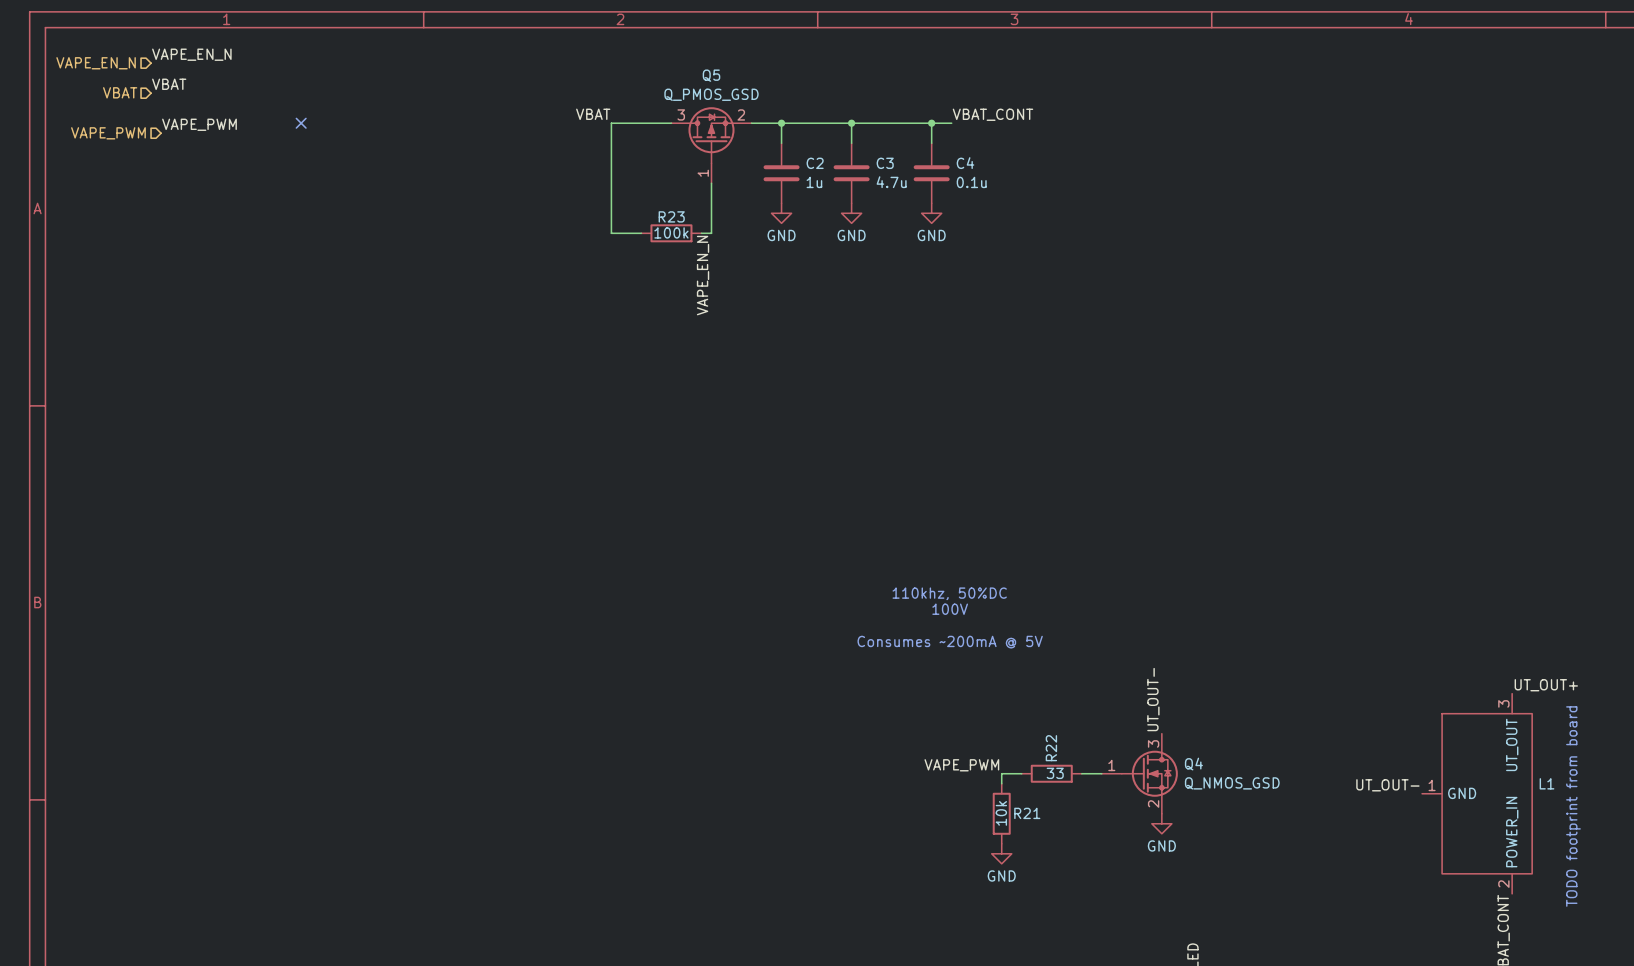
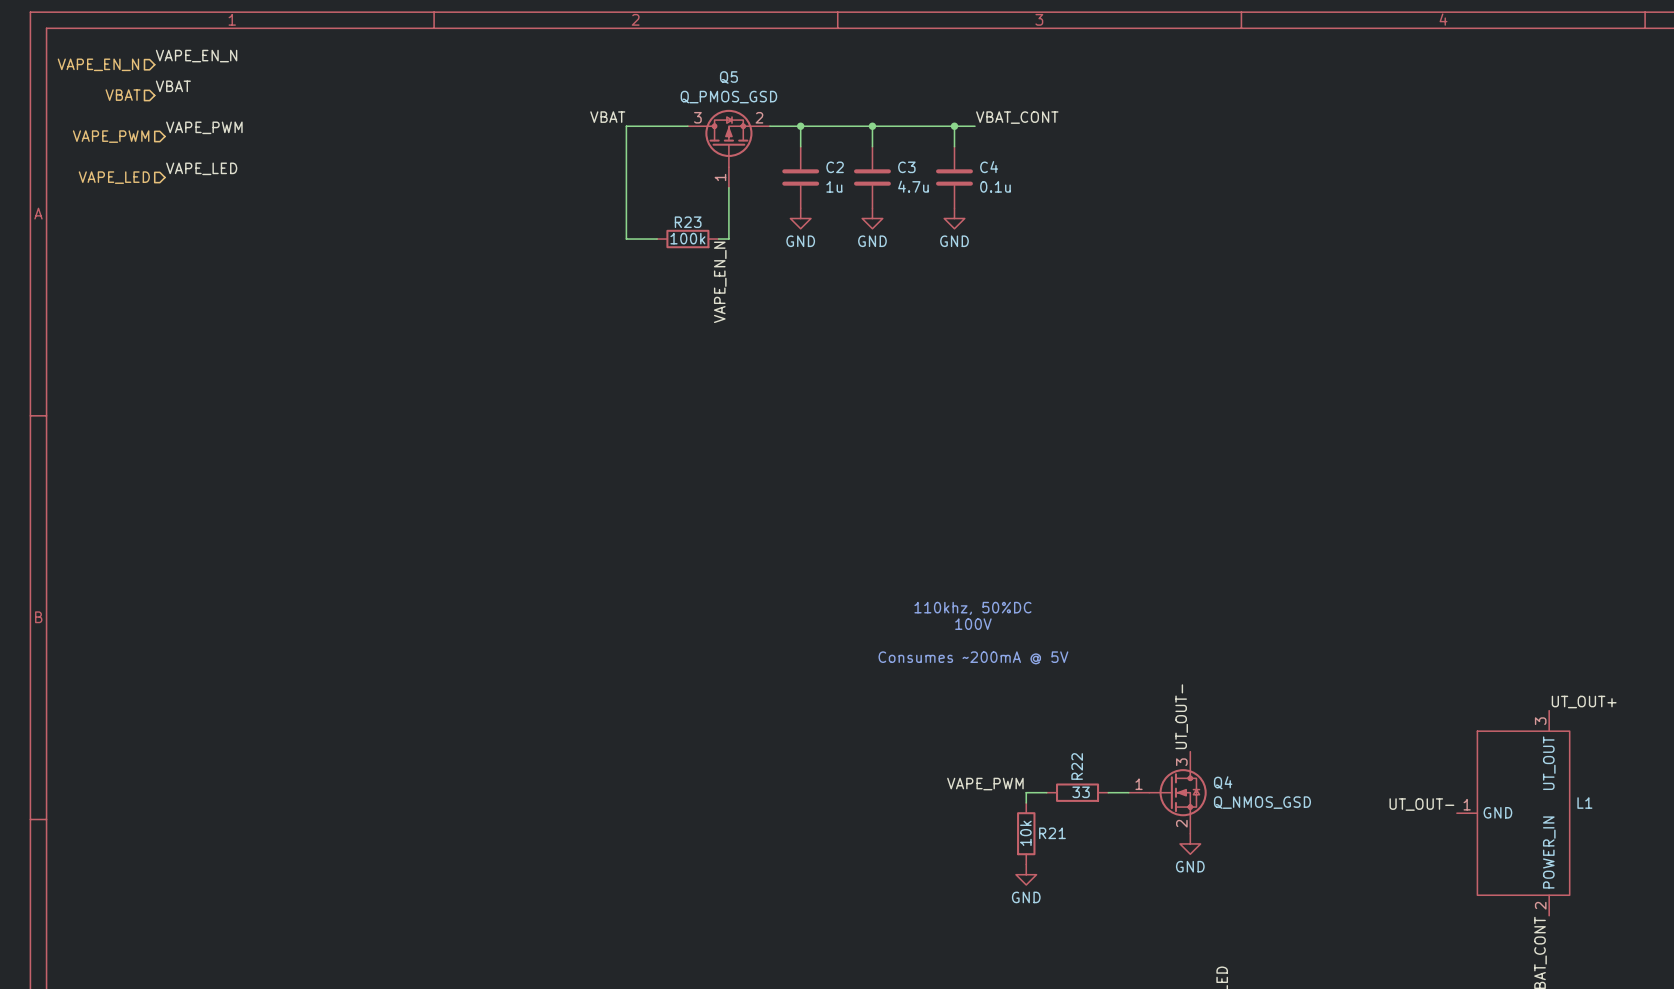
no-connect mark: (301, 123) -> none
label: none -> VAPE_LED (201, 168)
hierarchical label: none -> VAPE_LED (114, 177)
text: TODO footprint from board (1573, 806) -> none

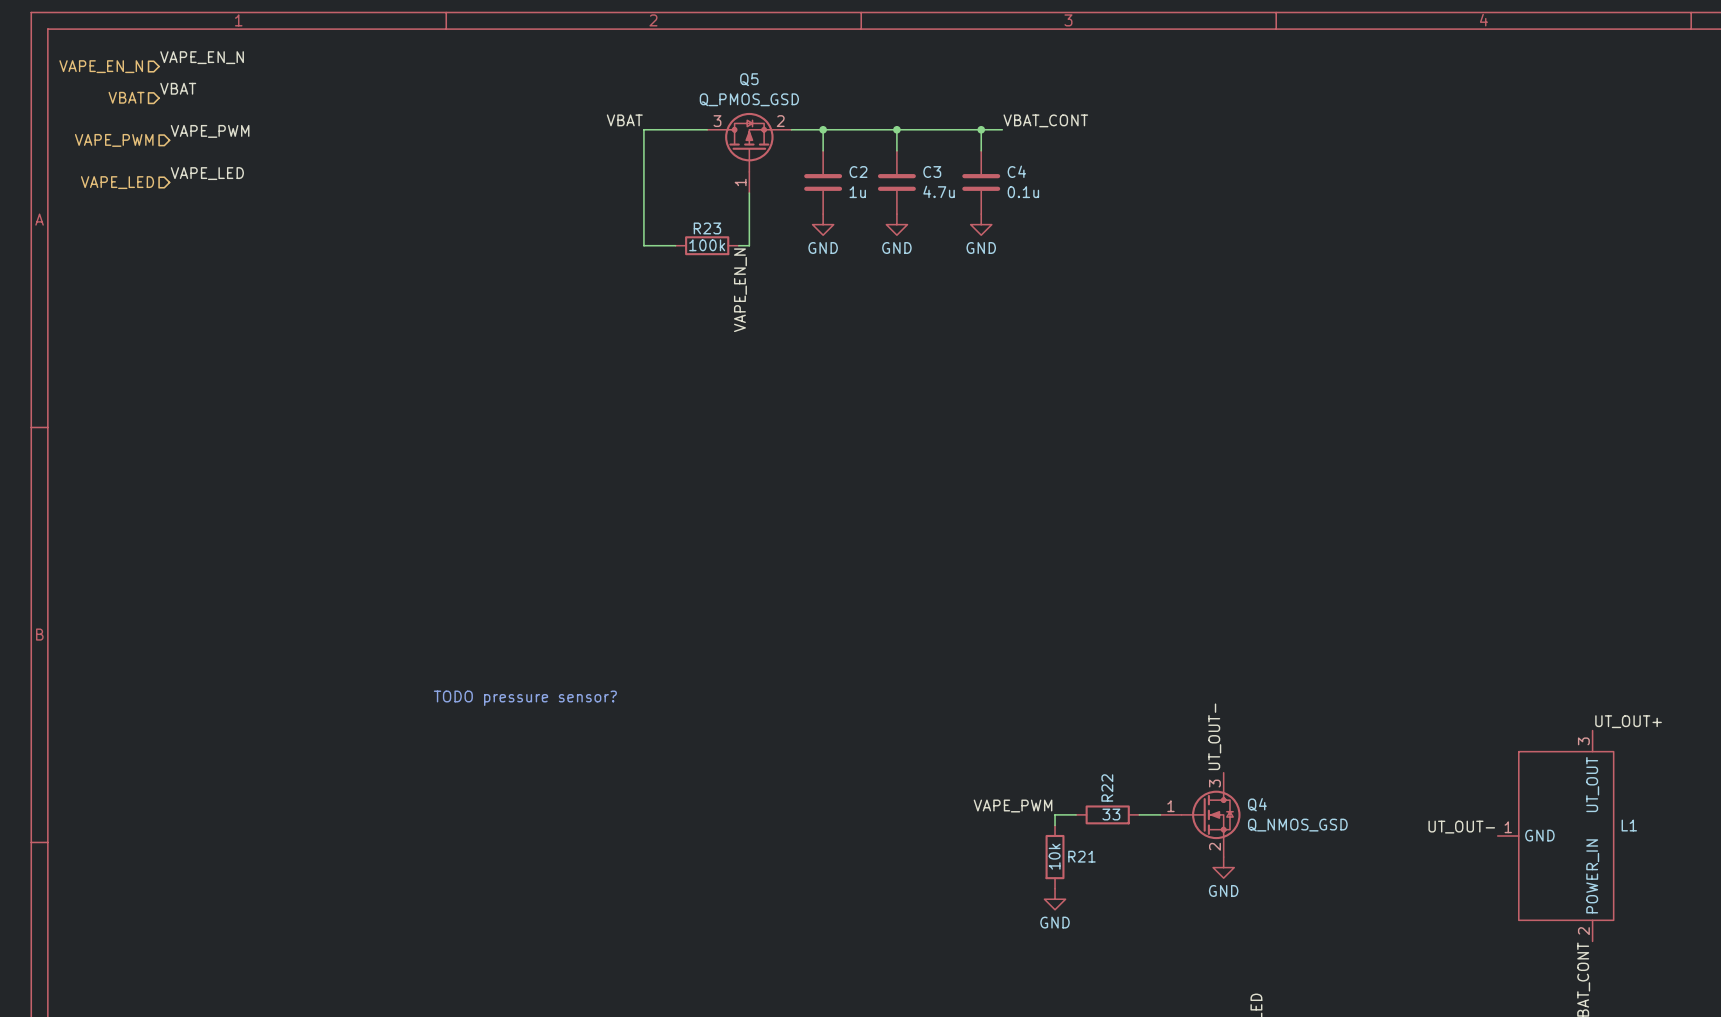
text: 110khz, 50%DC (972, 608) -> none
text: 100V (973, 624) -> none
text: Consumes ~200mA @ 5V (973, 657) -> none
text: none -> TODO pressure sensor? (525, 698)

